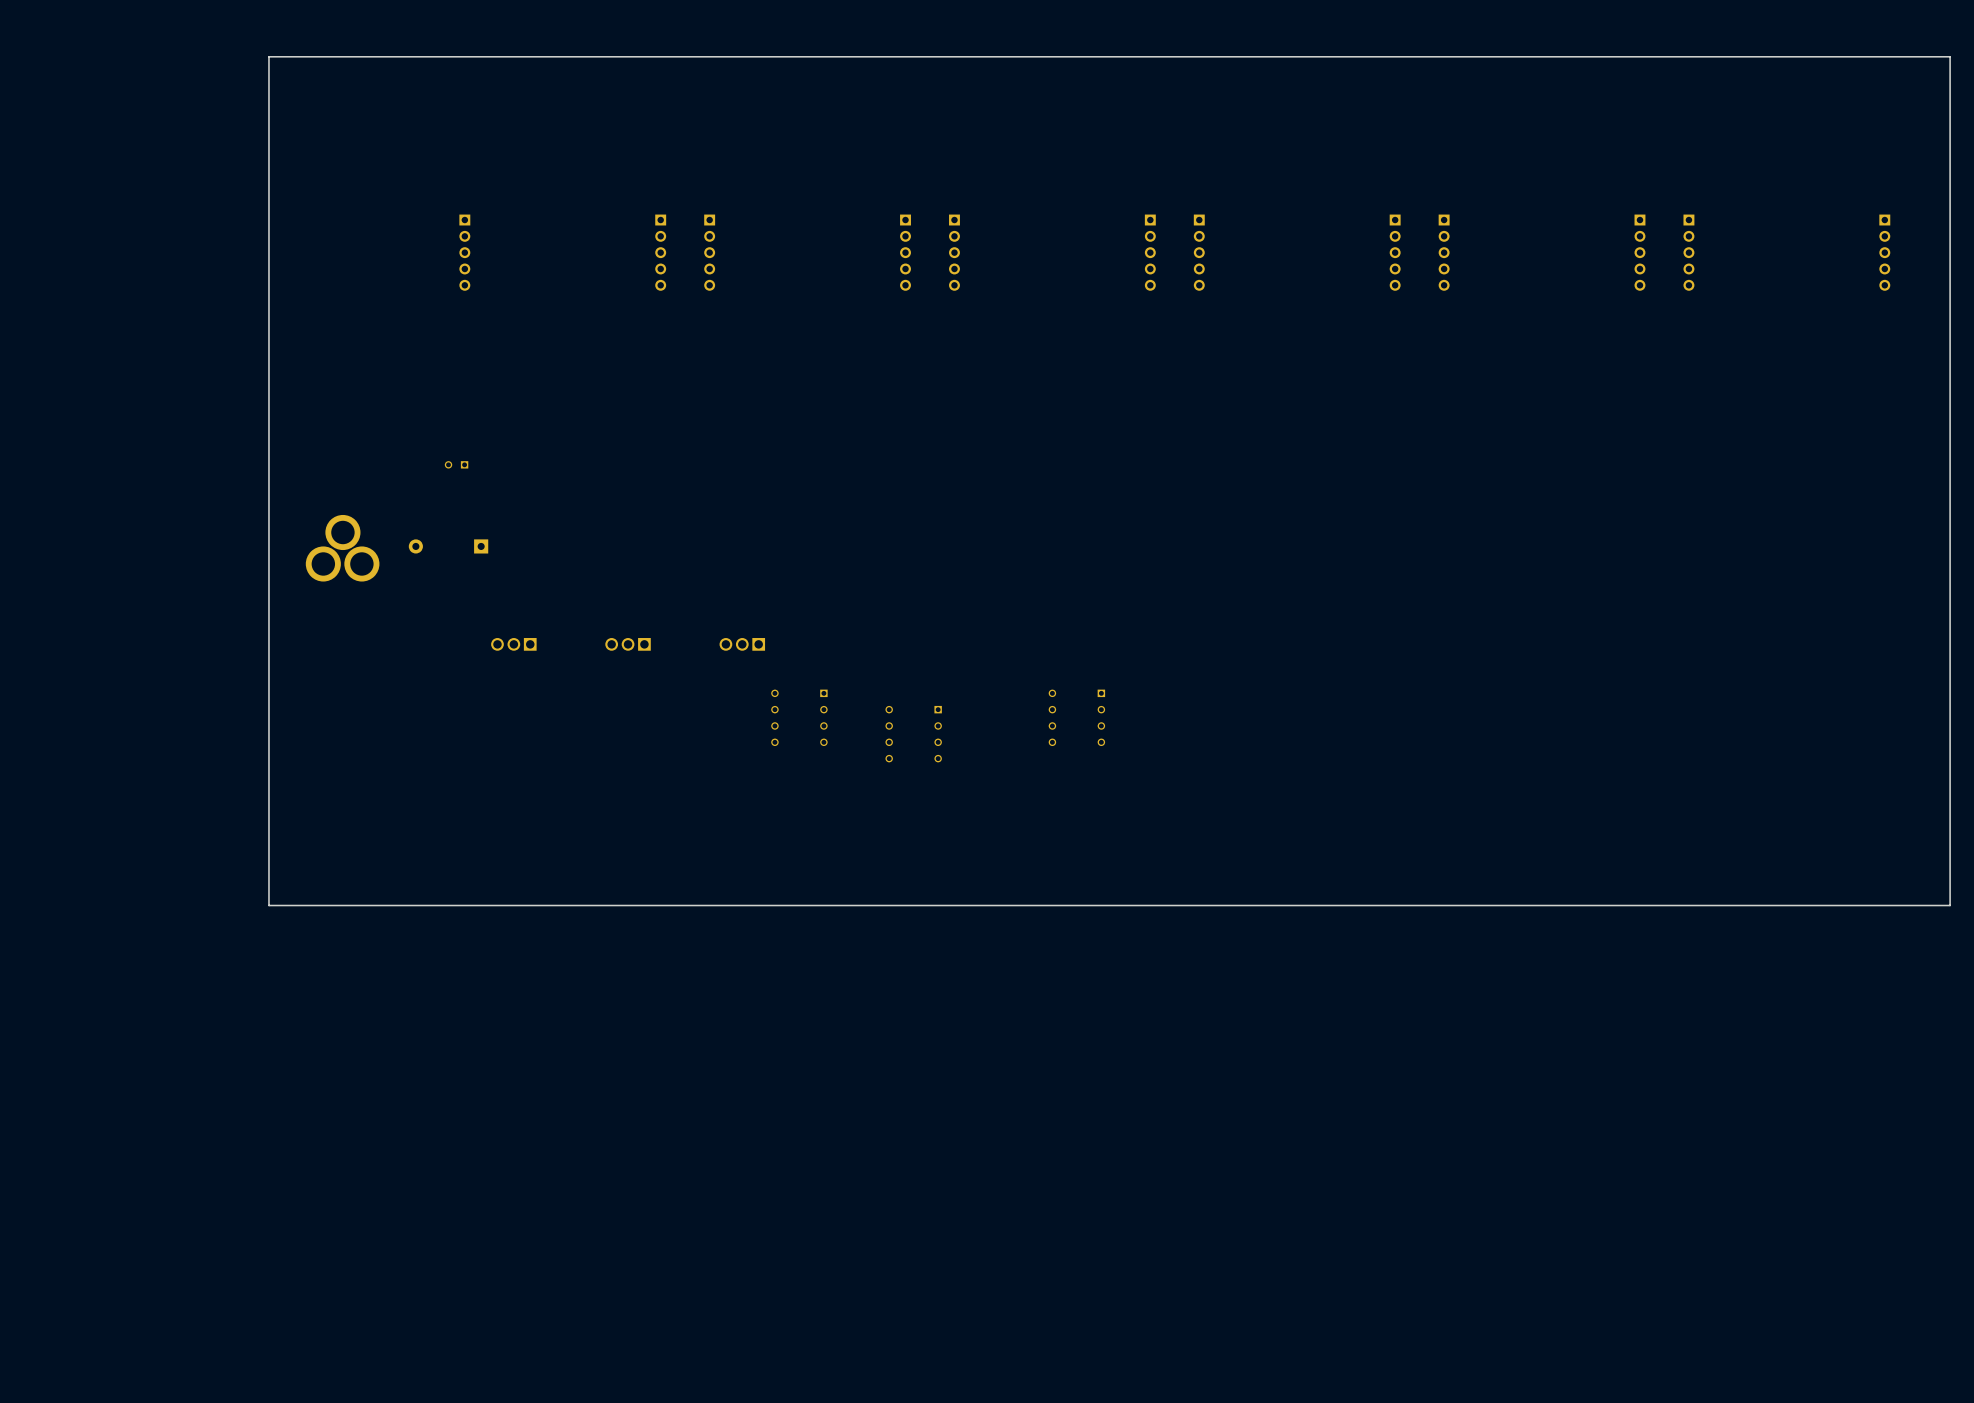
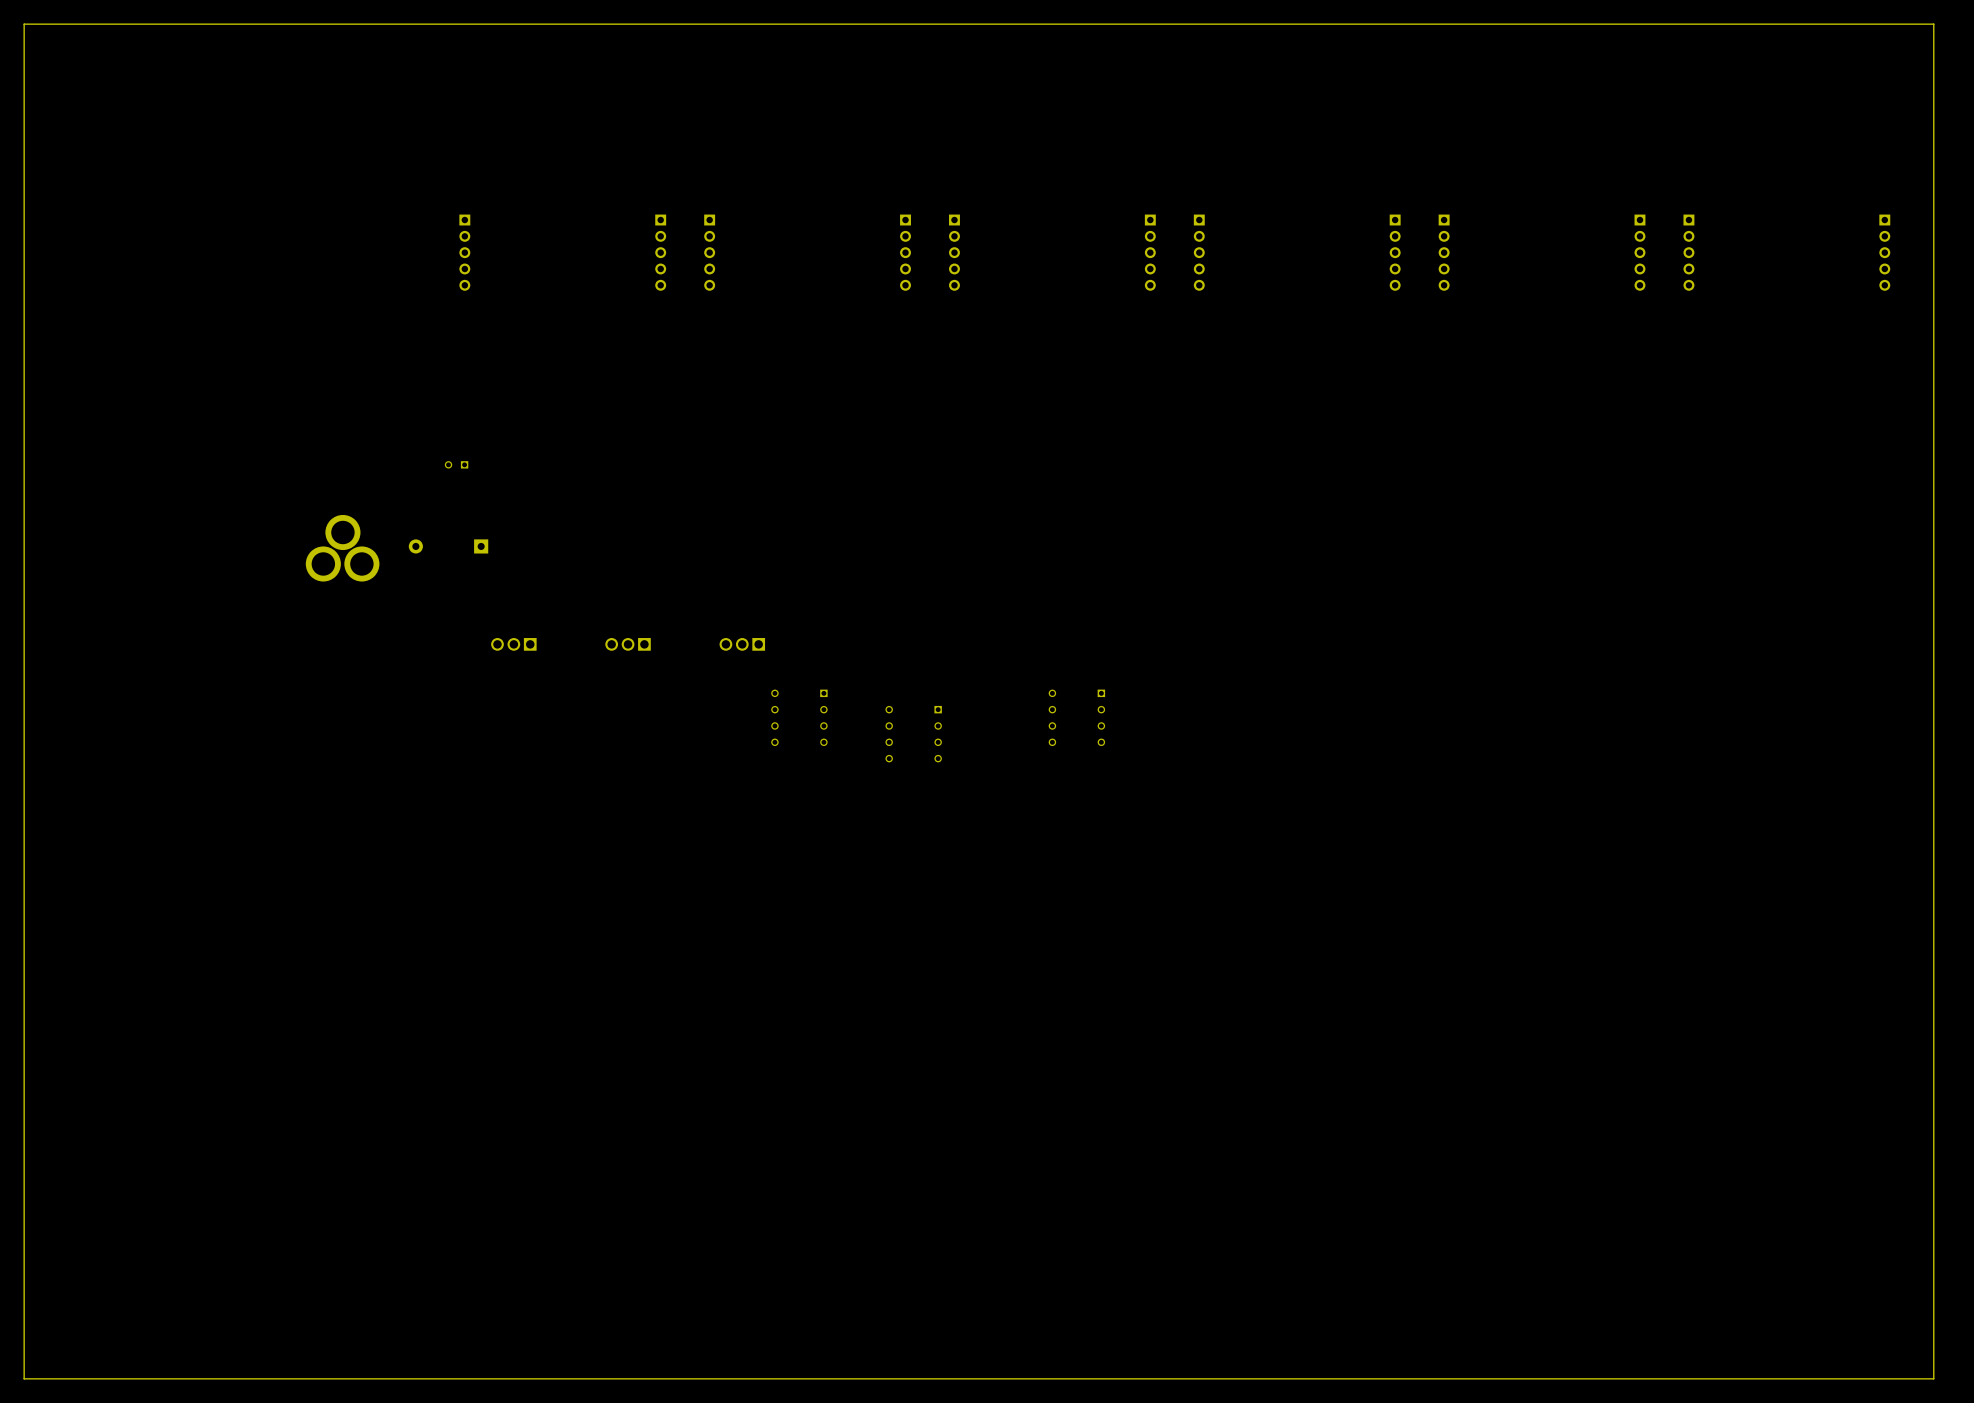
board edge: (1950, 56) (268, 56) (268, 905) (1950, 905) (1950, 56) -> (1933, 24) (1933, 1378) (24, 1378) (24, 24) (1933, 24)

